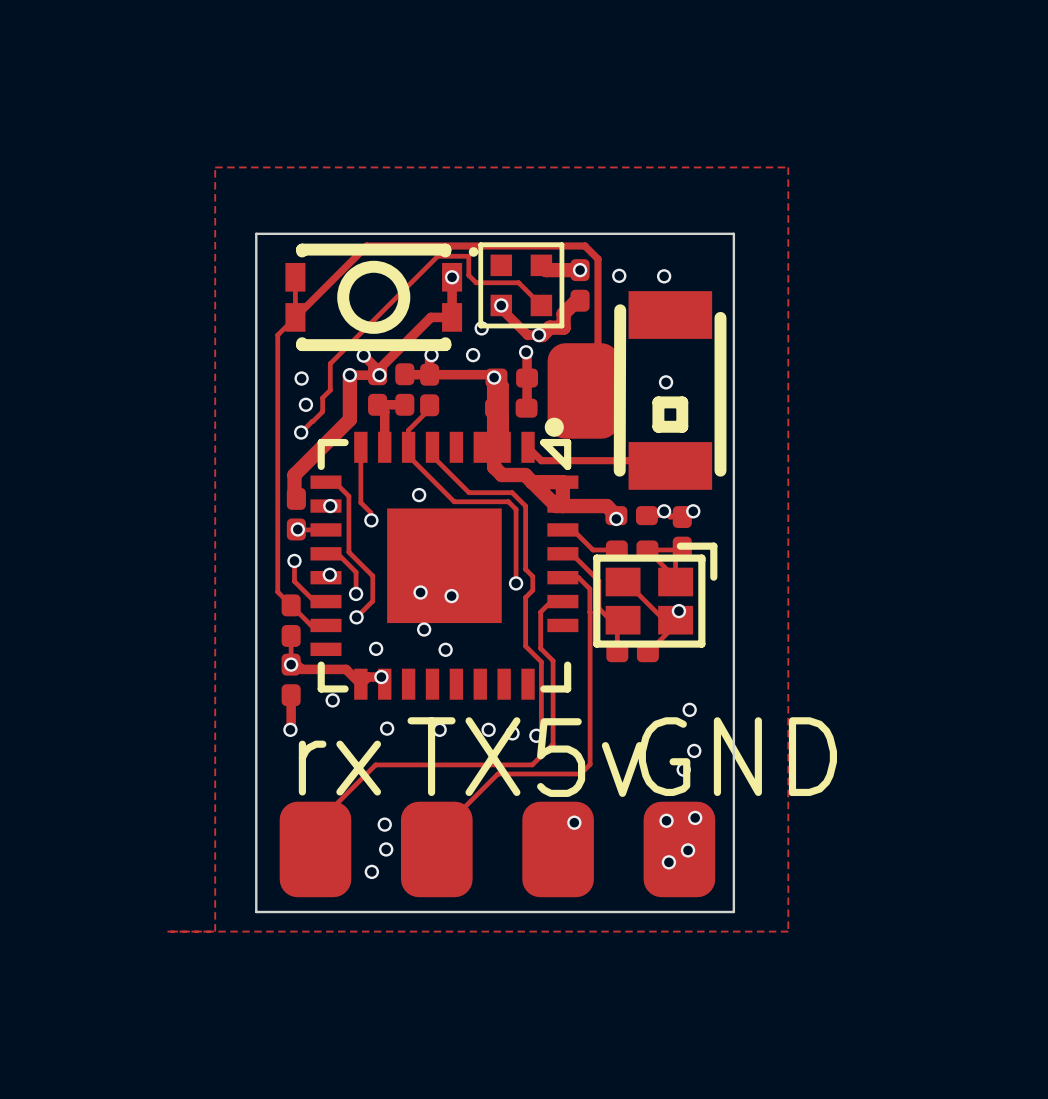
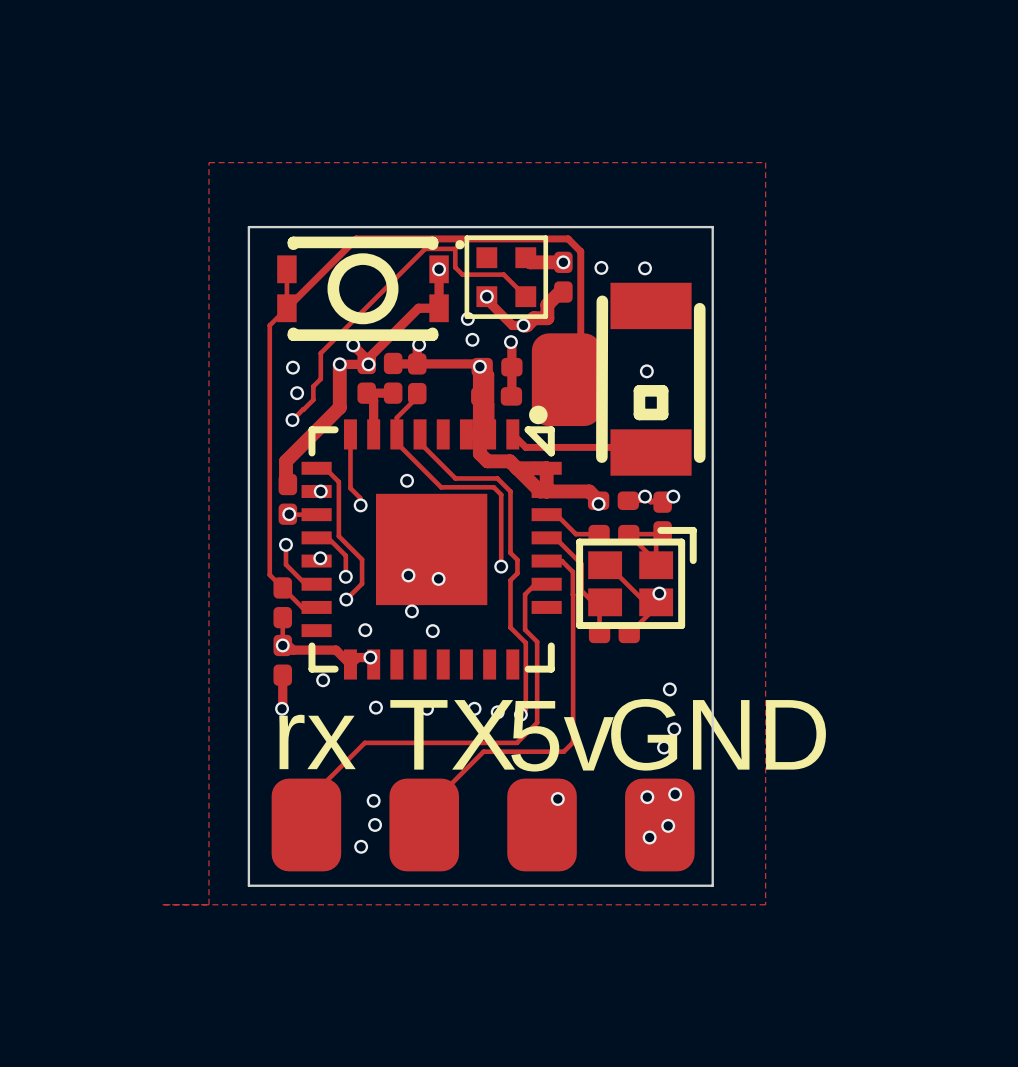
via position: (473, 355) -> (472, 339)

